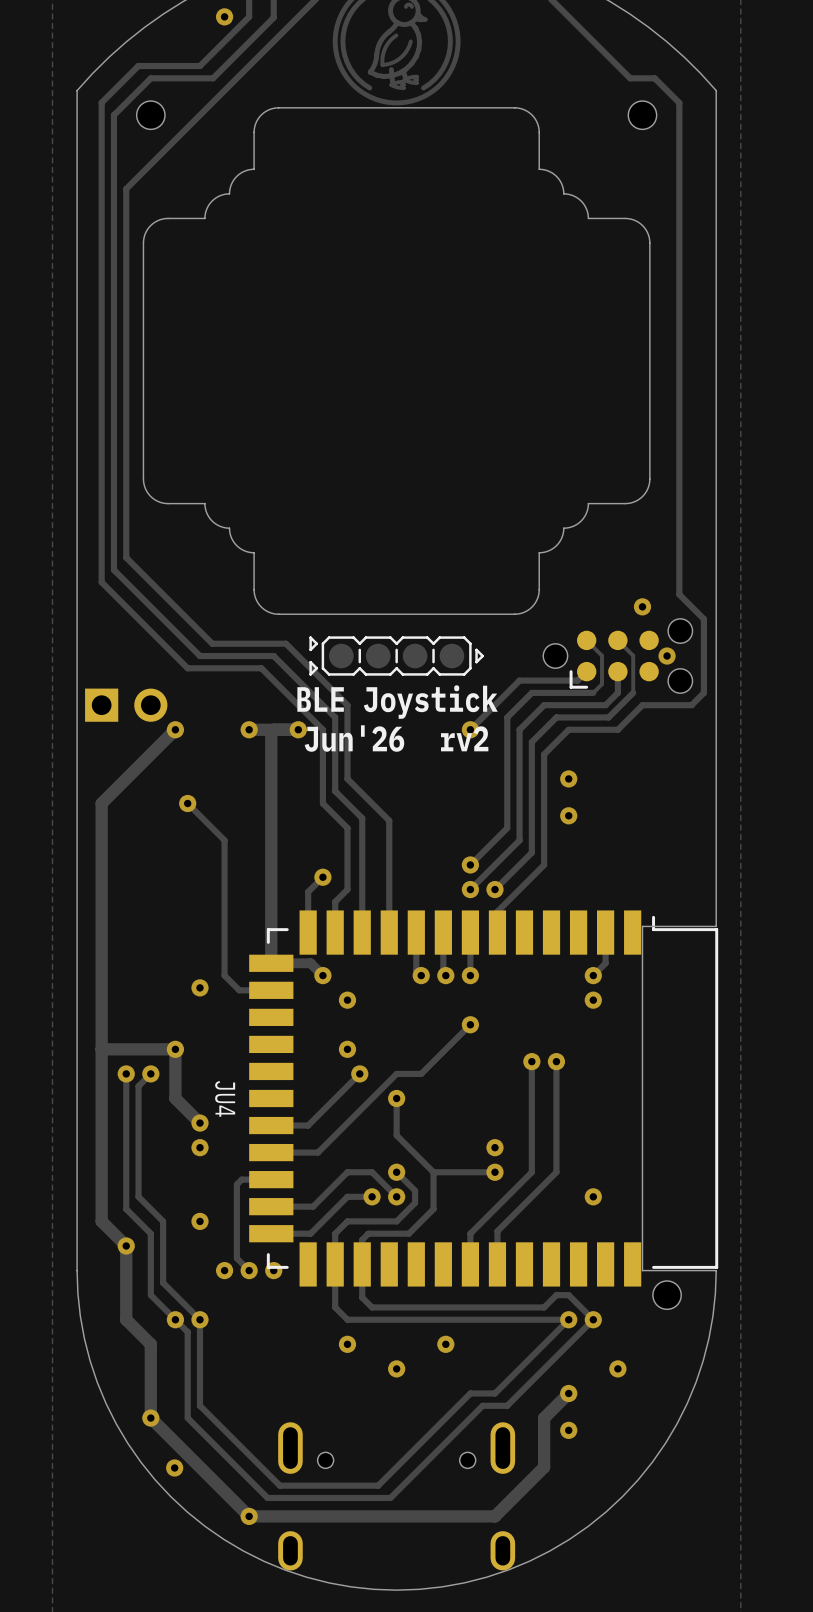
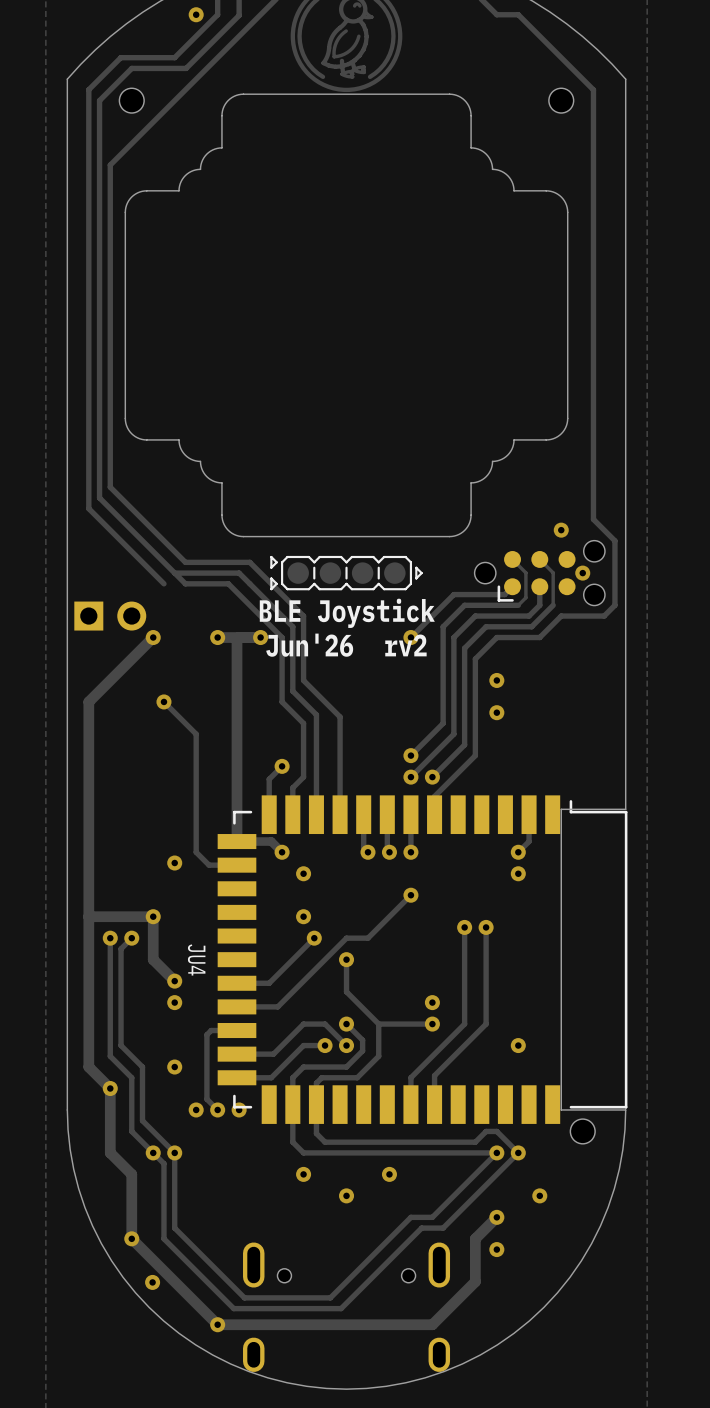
track: (568, 16) (630, 78) (654, 78) -> (496, 14) (518, 14) (572, 68)
track: (212, 668) (187, 668) -> (185, 583) (174, 573)

